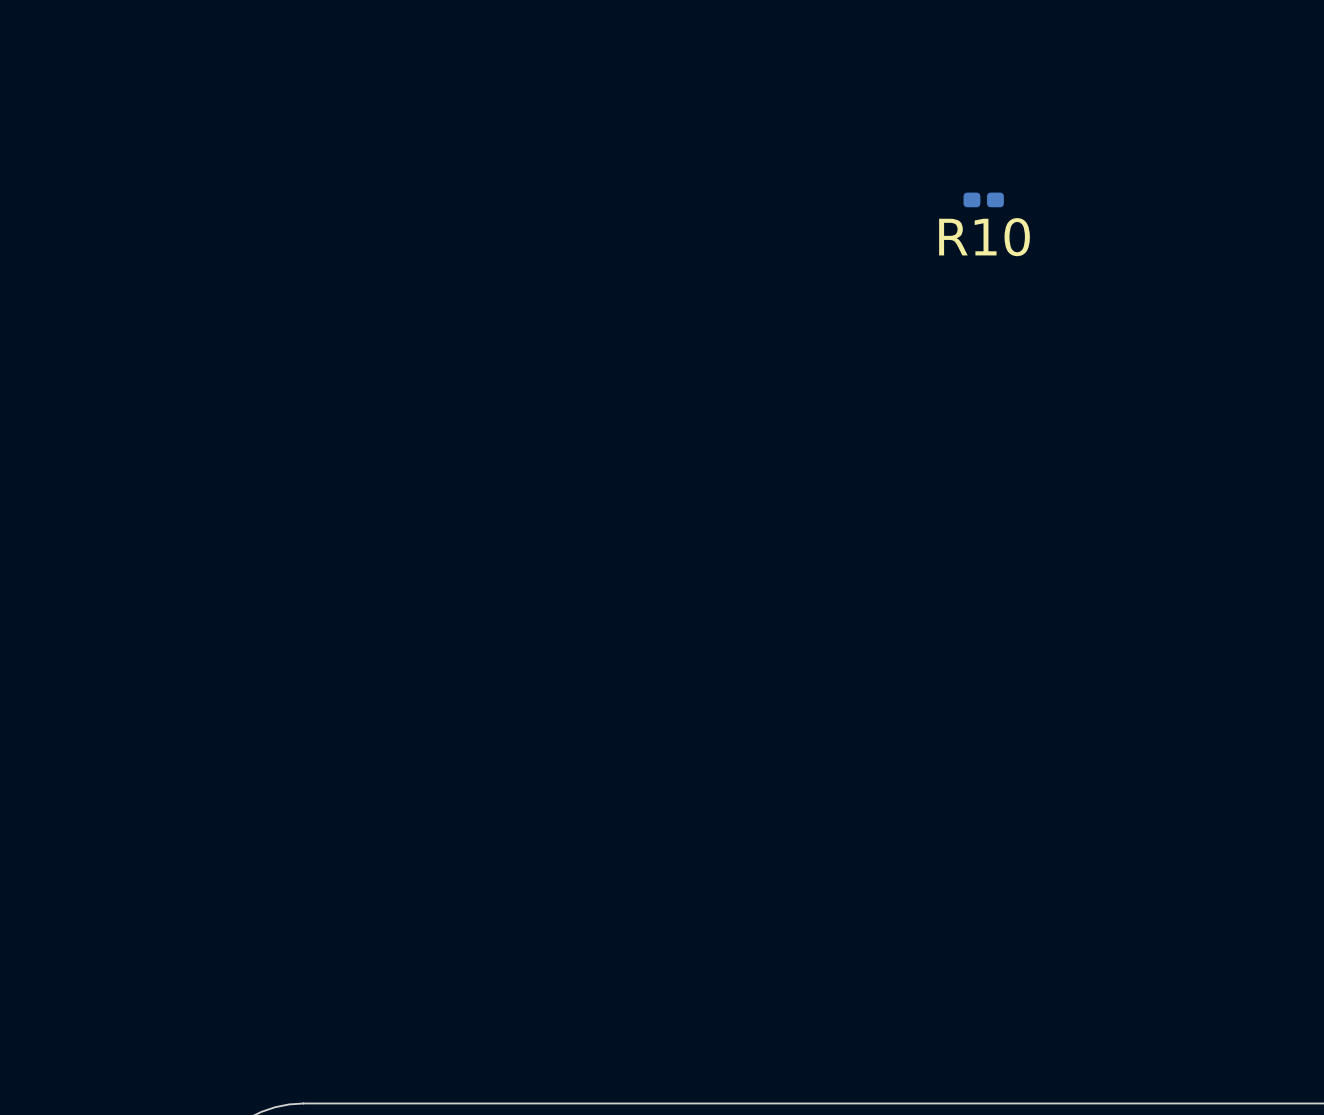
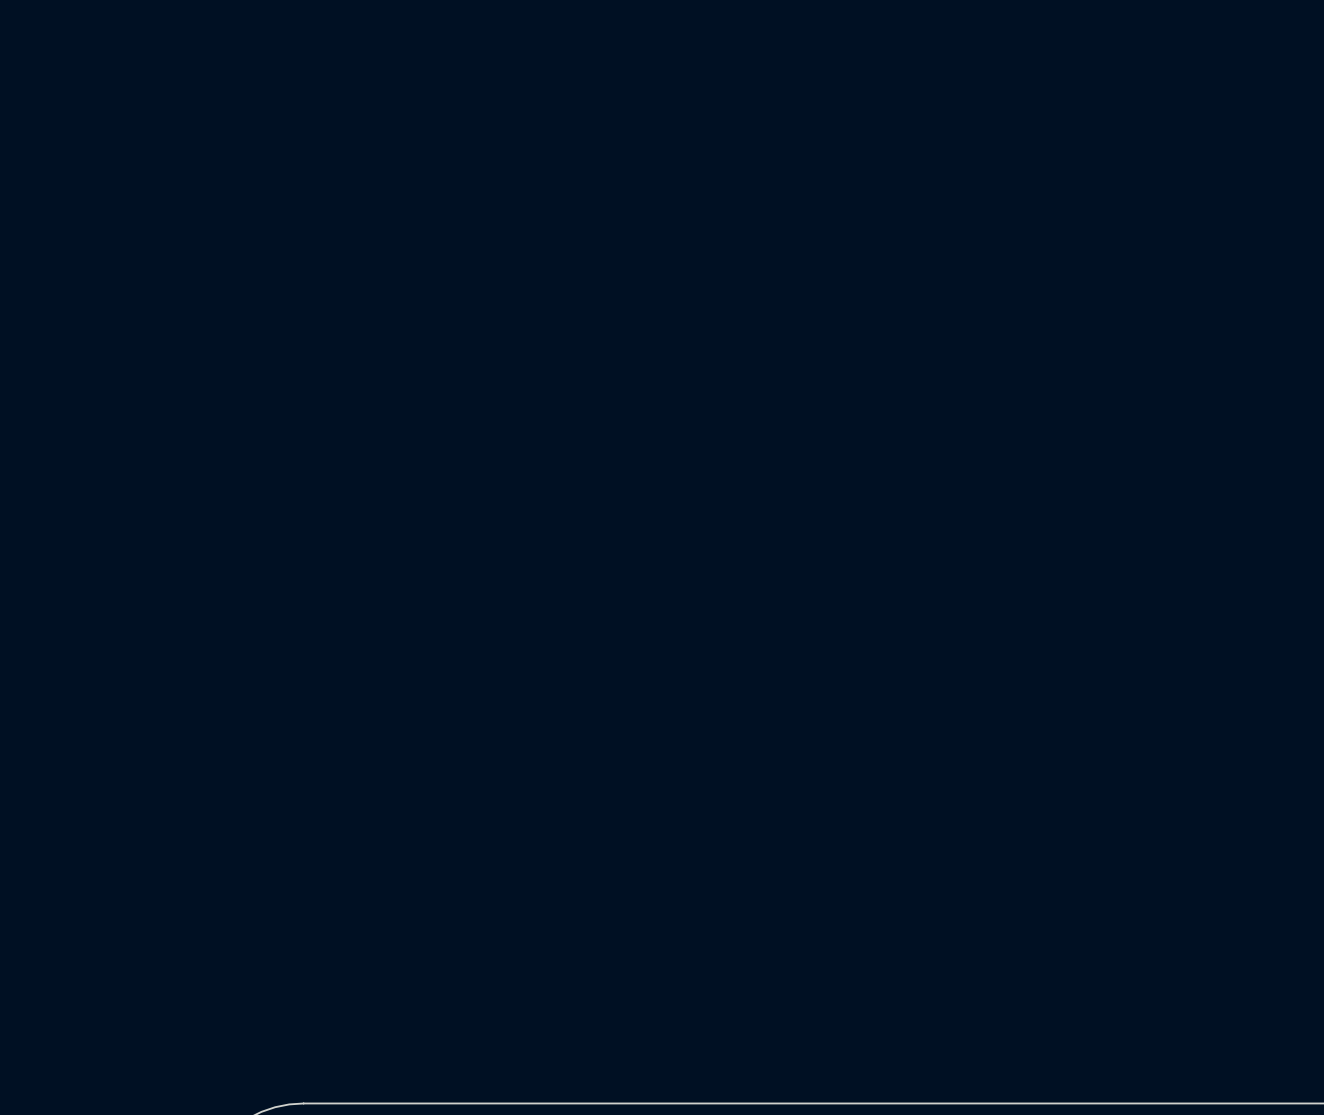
R10: (983, 199) -> none

